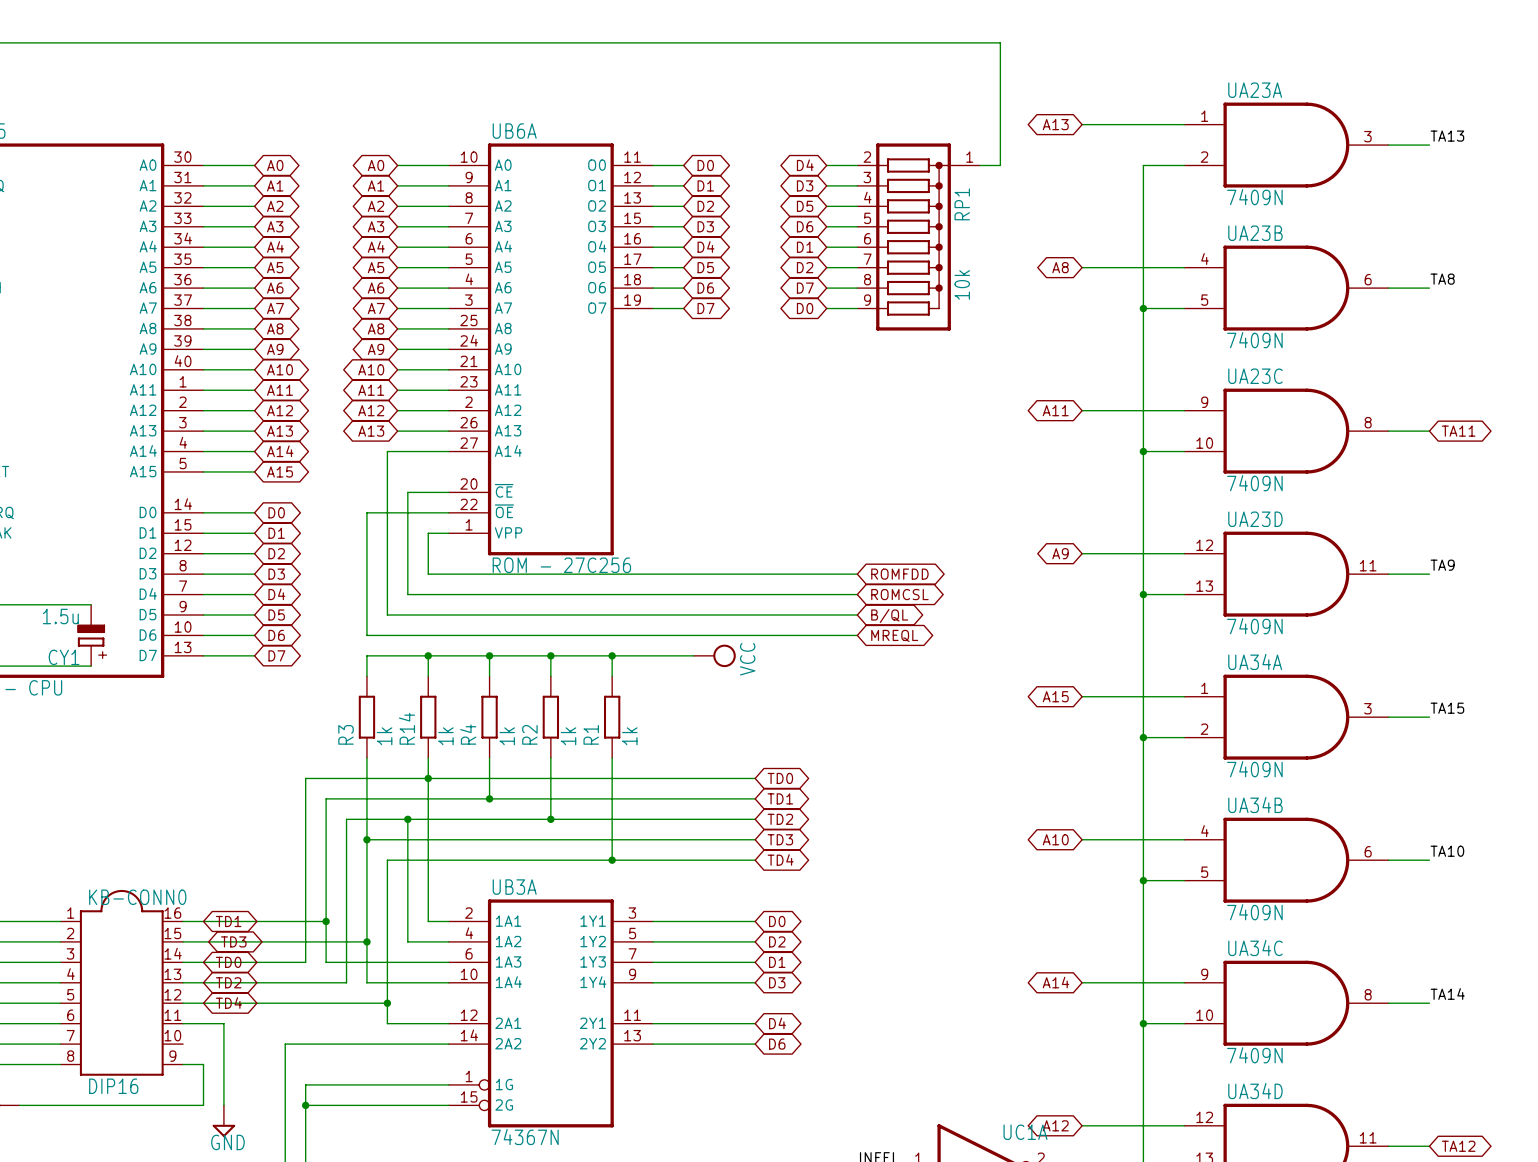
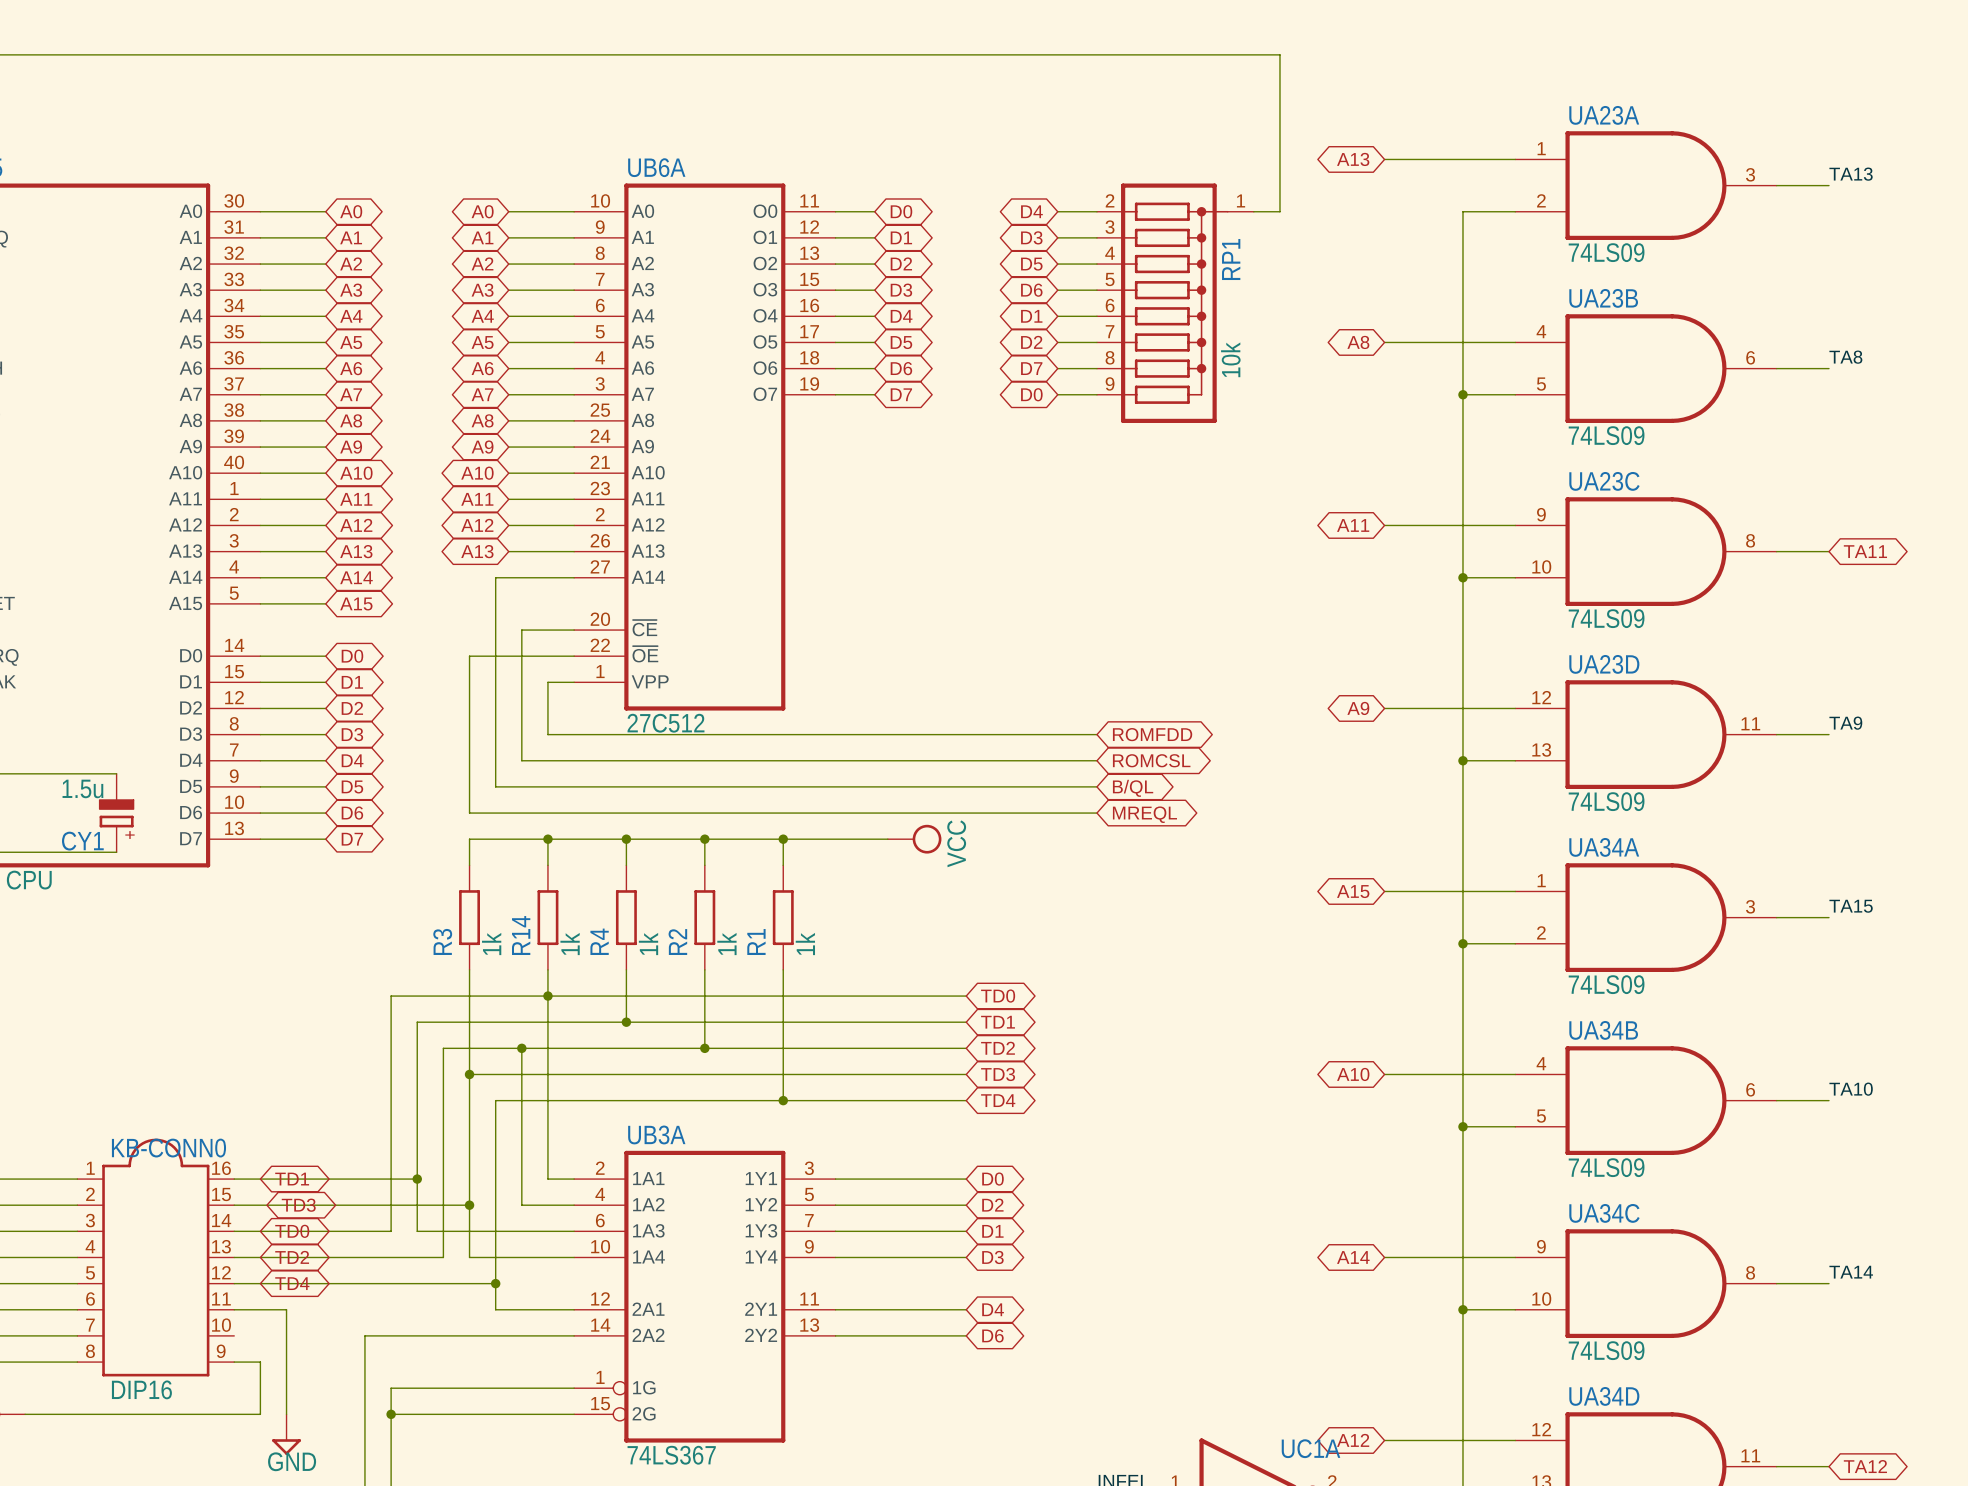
UA23A value: 7409N (1254, 197) -> 74LS09 (1606, 252)
UA23B value: 7409N (1254, 340) -> 74LS09 (1606, 435)
UA23C value: 7409N (1254, 483) -> 74LS09 (1606, 618)
UB6A value: ROM - 27C256 (561, 565) -> 27C512 (666, 723)
UA23D value: 7409N (1254, 626) -> 74LS09 (1606, 801)
UA34A value: 7409N (1254, 769) -> 74LS09 (1606, 984)
UA34B value: 7409N (1254, 912) -> 74LS09 (1606, 1167)
UA34C value: 7409N (1254, 1055) -> 74LS09 (1606, 1350)
UB3A value: 74367N (525, 1137) -> 74LS367 (671, 1455)

